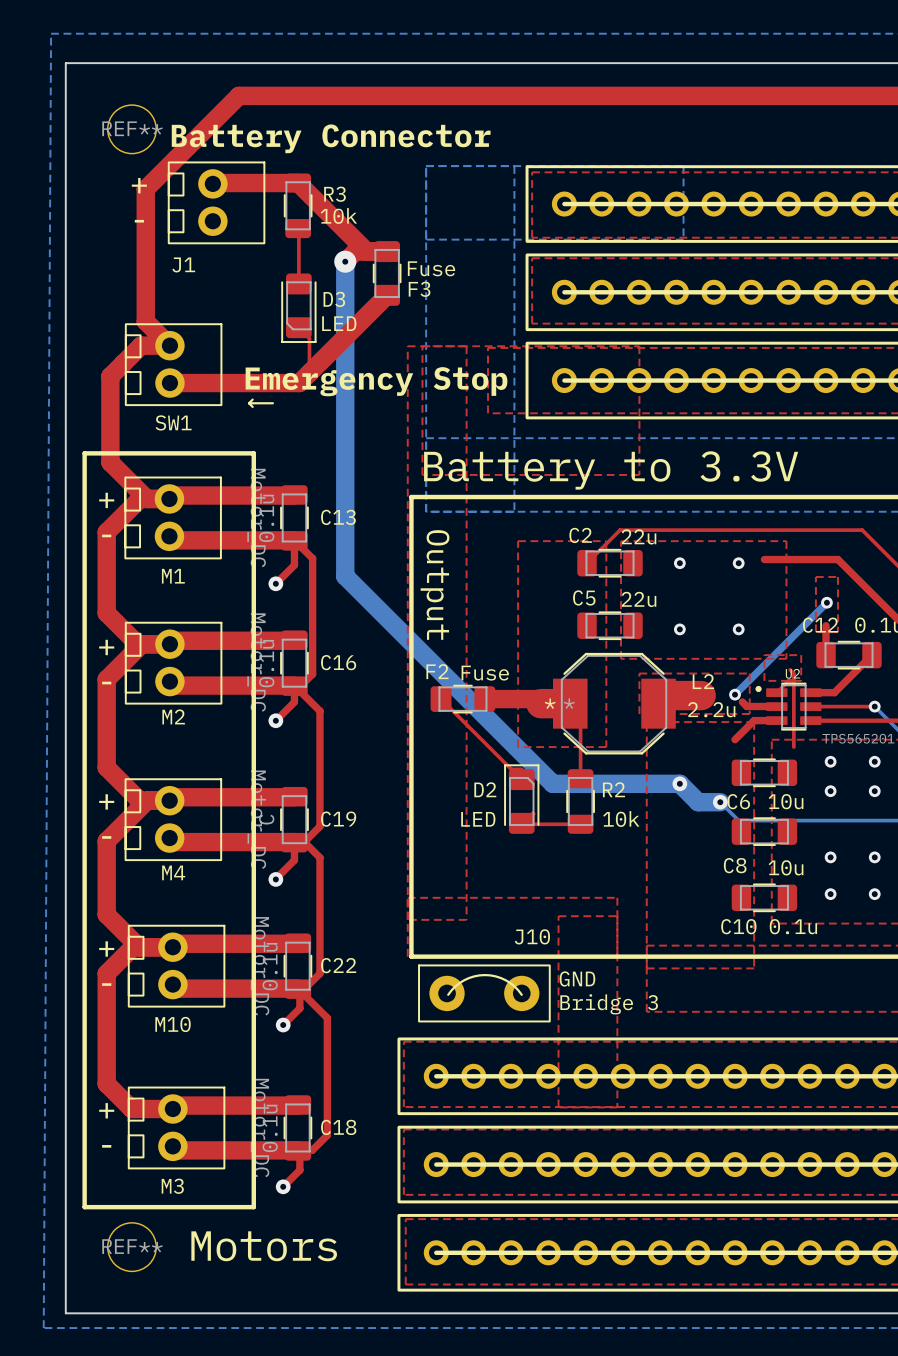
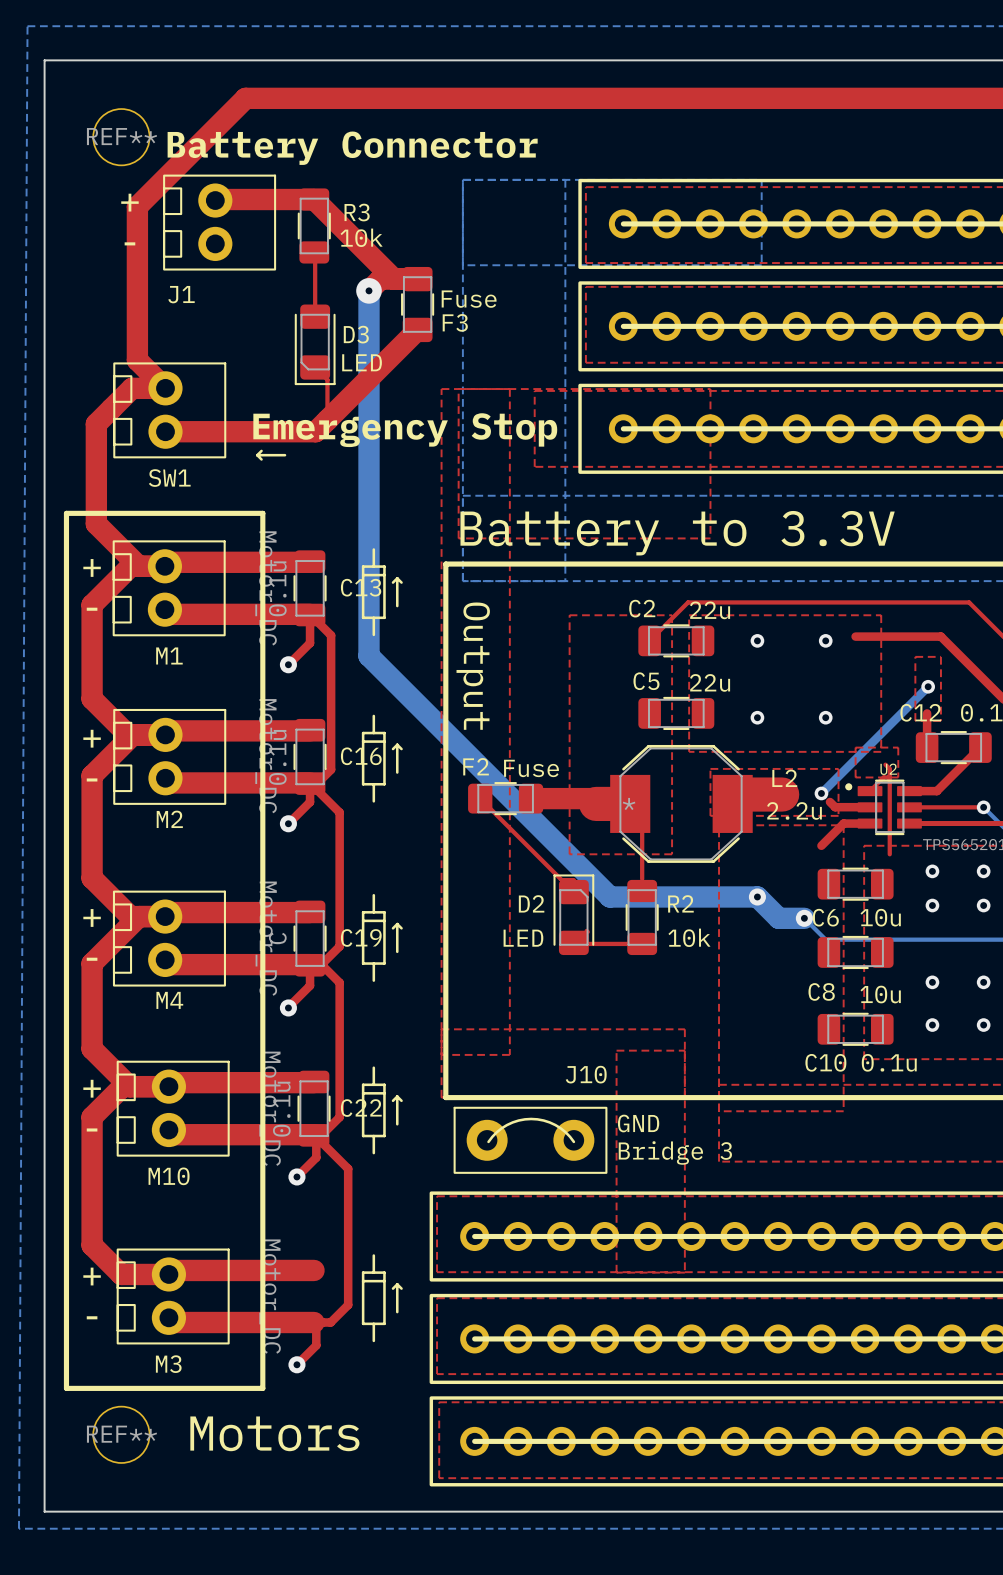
line: none -> (373, 549) (373, 566)
line: none -> (363, 566) (363, 617) (384, 617) (384, 566) (363, 566)
line: none -> (363, 575) (384, 575)
line: none -> (397, 578) (397, 606)
line: none -> (397, 578) (393, 582)
line: none -> (397, 578) (401, 582)
line: none -> (373, 617) (373, 634)
line: none -> (373, 715) (373, 733)
line: none -> (363, 733) (363, 784) (384, 784) (384, 733) (363, 733)
line: none -> (363, 741) (384, 741)
line: none -> (397, 744) (397, 772)
line: none -> (397, 744) (393, 749)
line: none -> (397, 744) (401, 749)
line: none -> (373, 784) (373, 801)
L2 text: * (550, 703) -> none
line: none -> (373, 895) (373, 912)
line: none -> (363, 912) (363, 963) (384, 963) (384, 912) (363, 912)
line: none -> (363, 920) (384, 920)
line: none -> (397, 924) (397, 951)
line: none -> (397, 924) (401, 928)
line: none -> (397, 924) (393, 928)
line: none -> (373, 963) (373, 980)
line: none -> (373, 1067) (373, 1084)
line: none -> (363, 1084) (363, 1136) (384, 1136) (384, 1084) (363, 1084)
line: none -> (363, 1093) (384, 1093)
line: none -> (397, 1096) (397, 1124)
line: none -> (397, 1096) (401, 1100)
line: none -> (397, 1096) (393, 1100)
line: none -> (373, 1136) (373, 1153)
line: none -> (373, 1255) (373, 1272)
line: none -> (363, 1272) (384, 1272) (384, 1323) (363, 1323) (363, 1272)
line: none -> (363, 1281) (384, 1281)
line: none -> (397, 1284) (397, 1312)
line: none -> (397, 1284) (393, 1288)
line: none -> (397, 1284) (401, 1288)
C18: 0.1u (297, 1127) -> none
line: none -> (373, 1323) (373, 1340)

